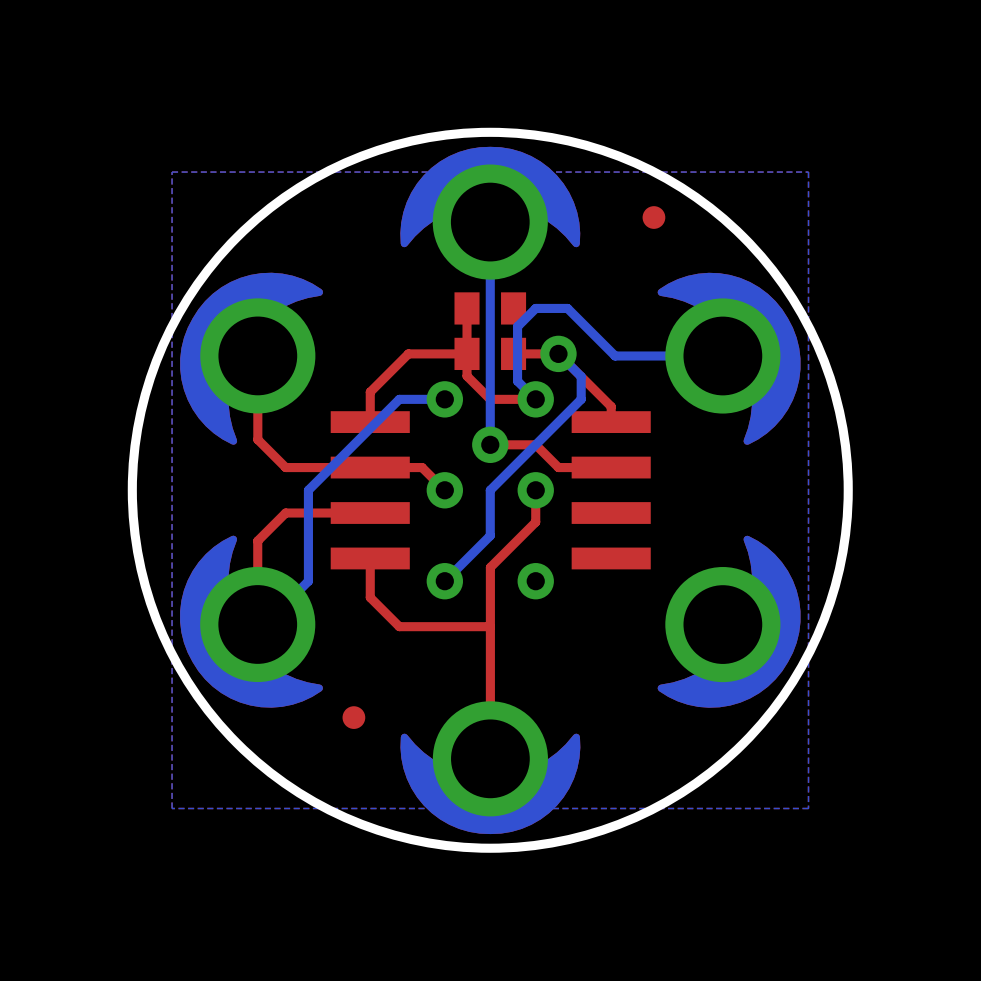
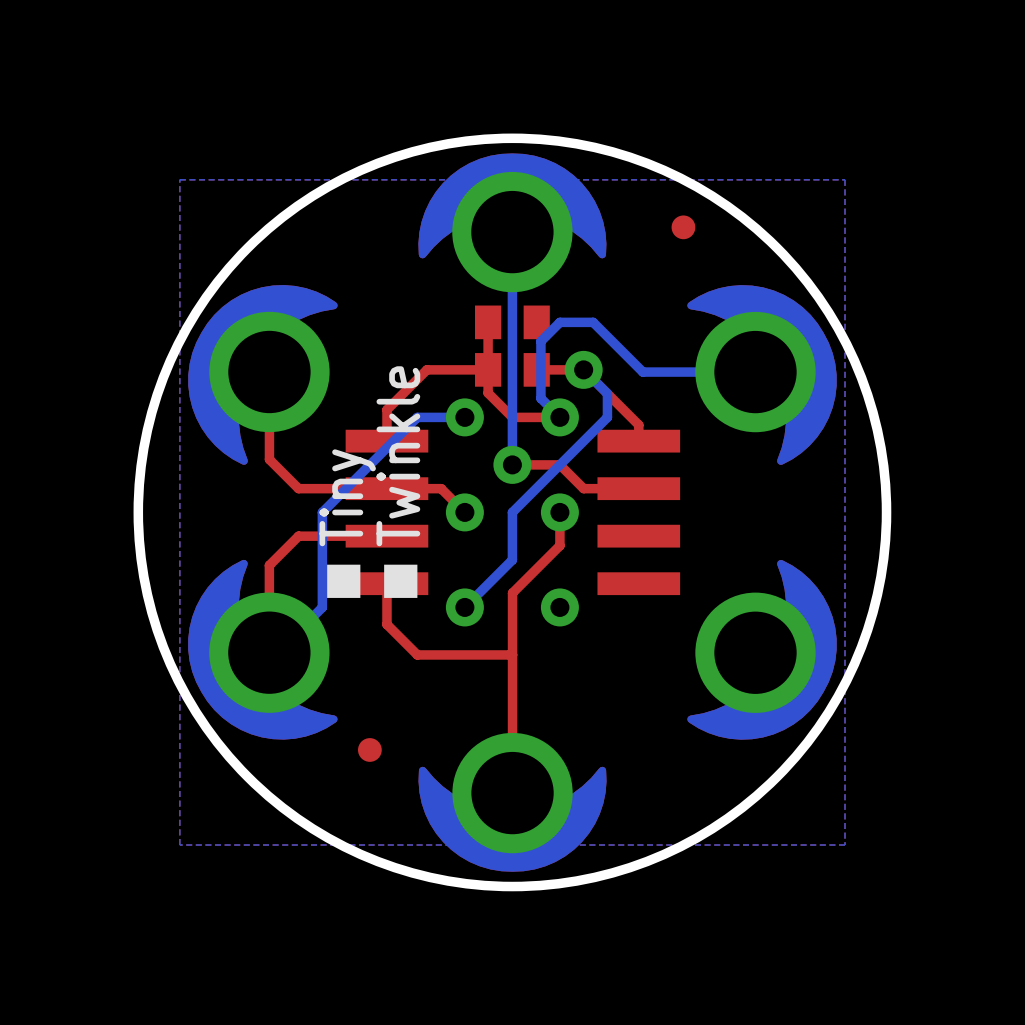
text: none -> Twinkle (398, 456)
text: none -> Tiny (347, 497)
drawing: none -> [327, 564, 418, 598]

